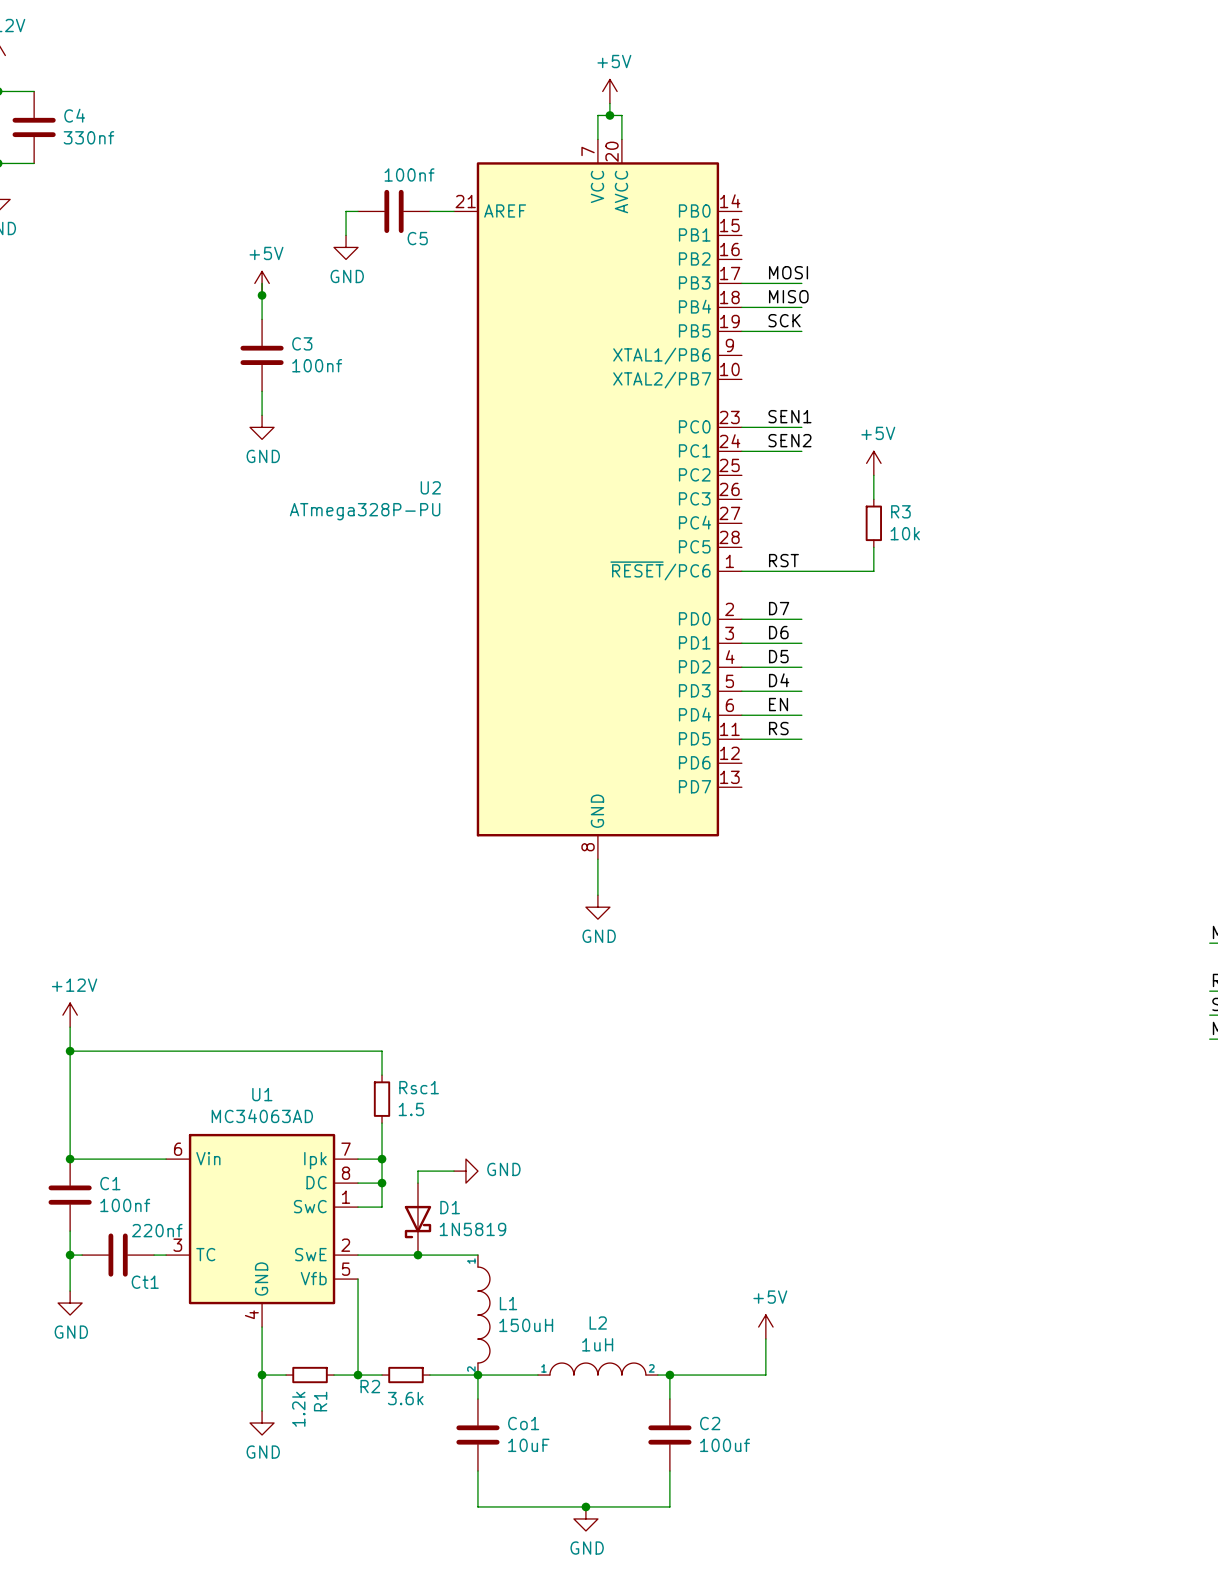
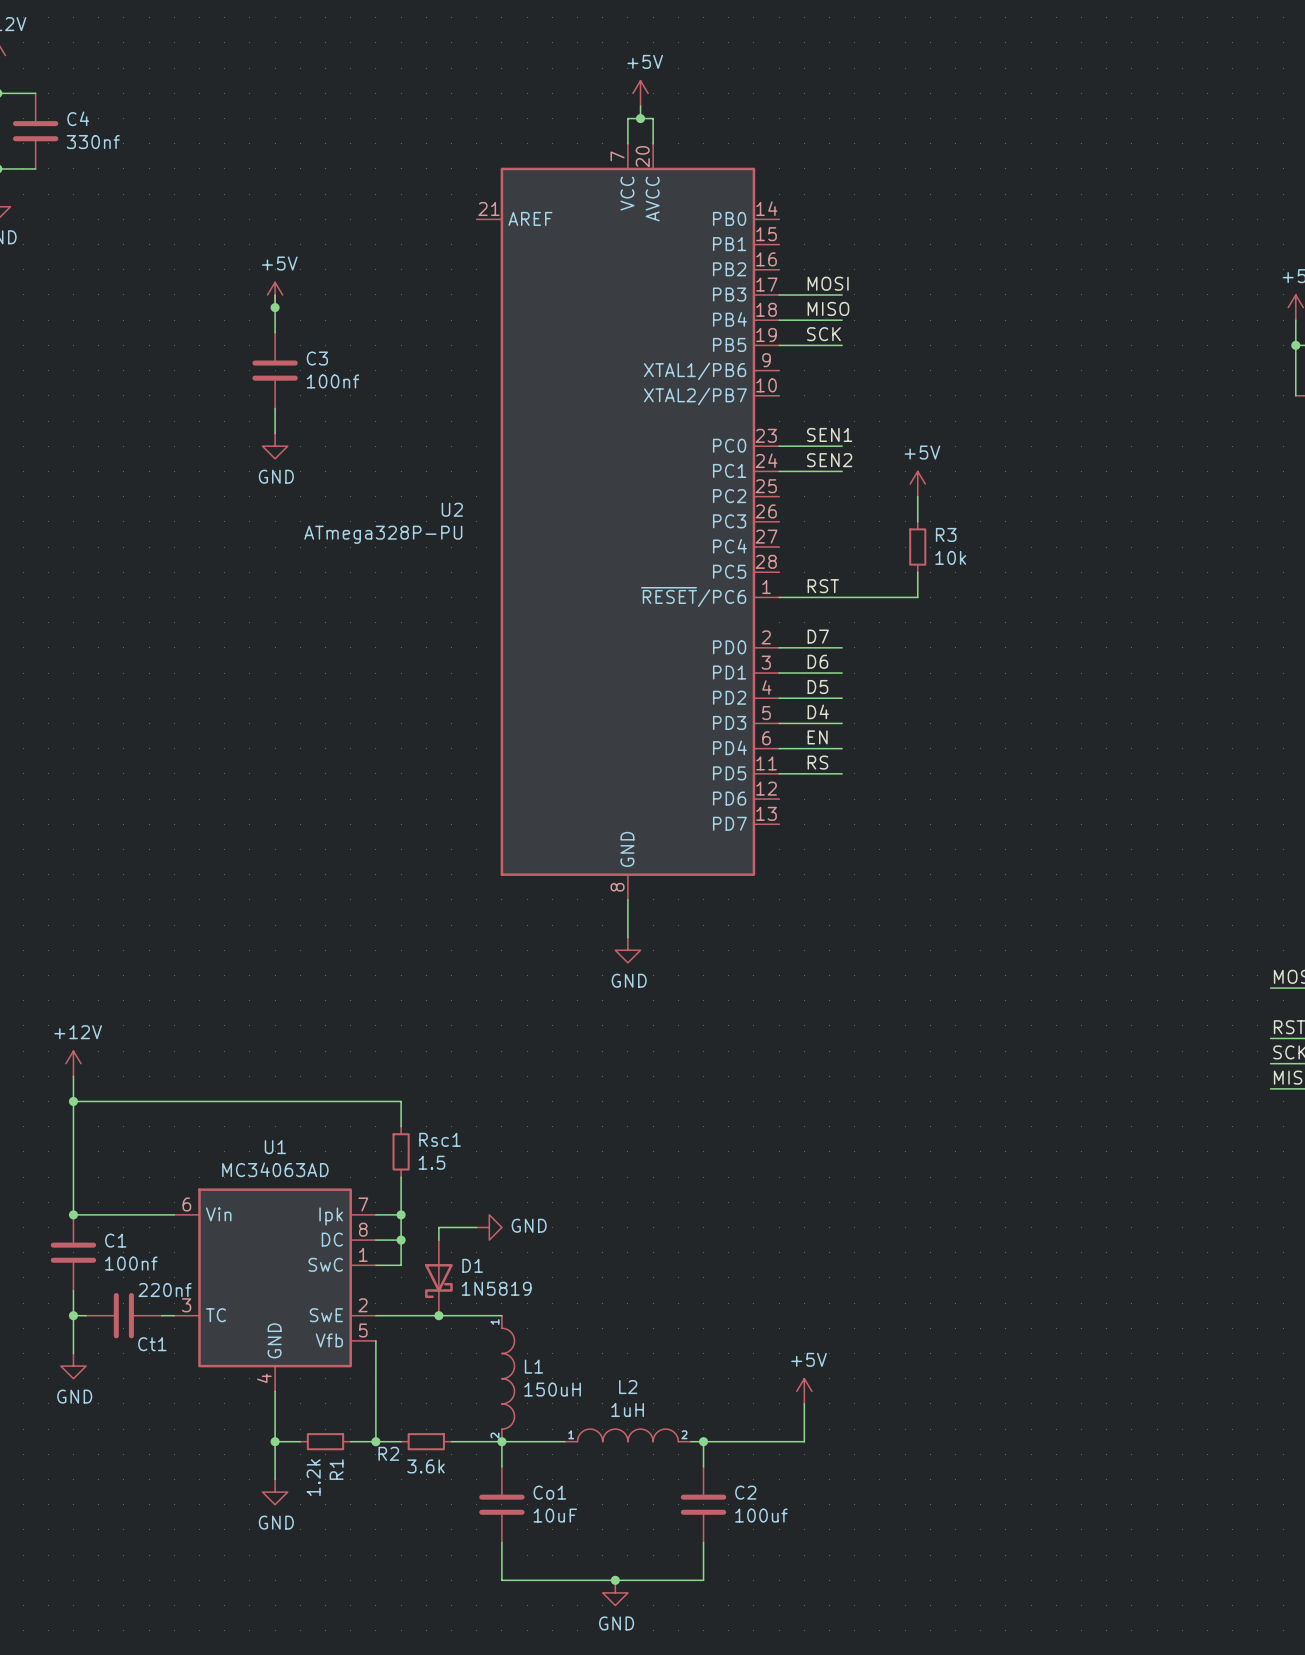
wire: (358, 211) (346, 211) (346, 235) -> none
C5: 100nf (394, 211) -> none
wire: (429, 211) (453, 211) -> none
power symbol: GND (346, 247) -> none

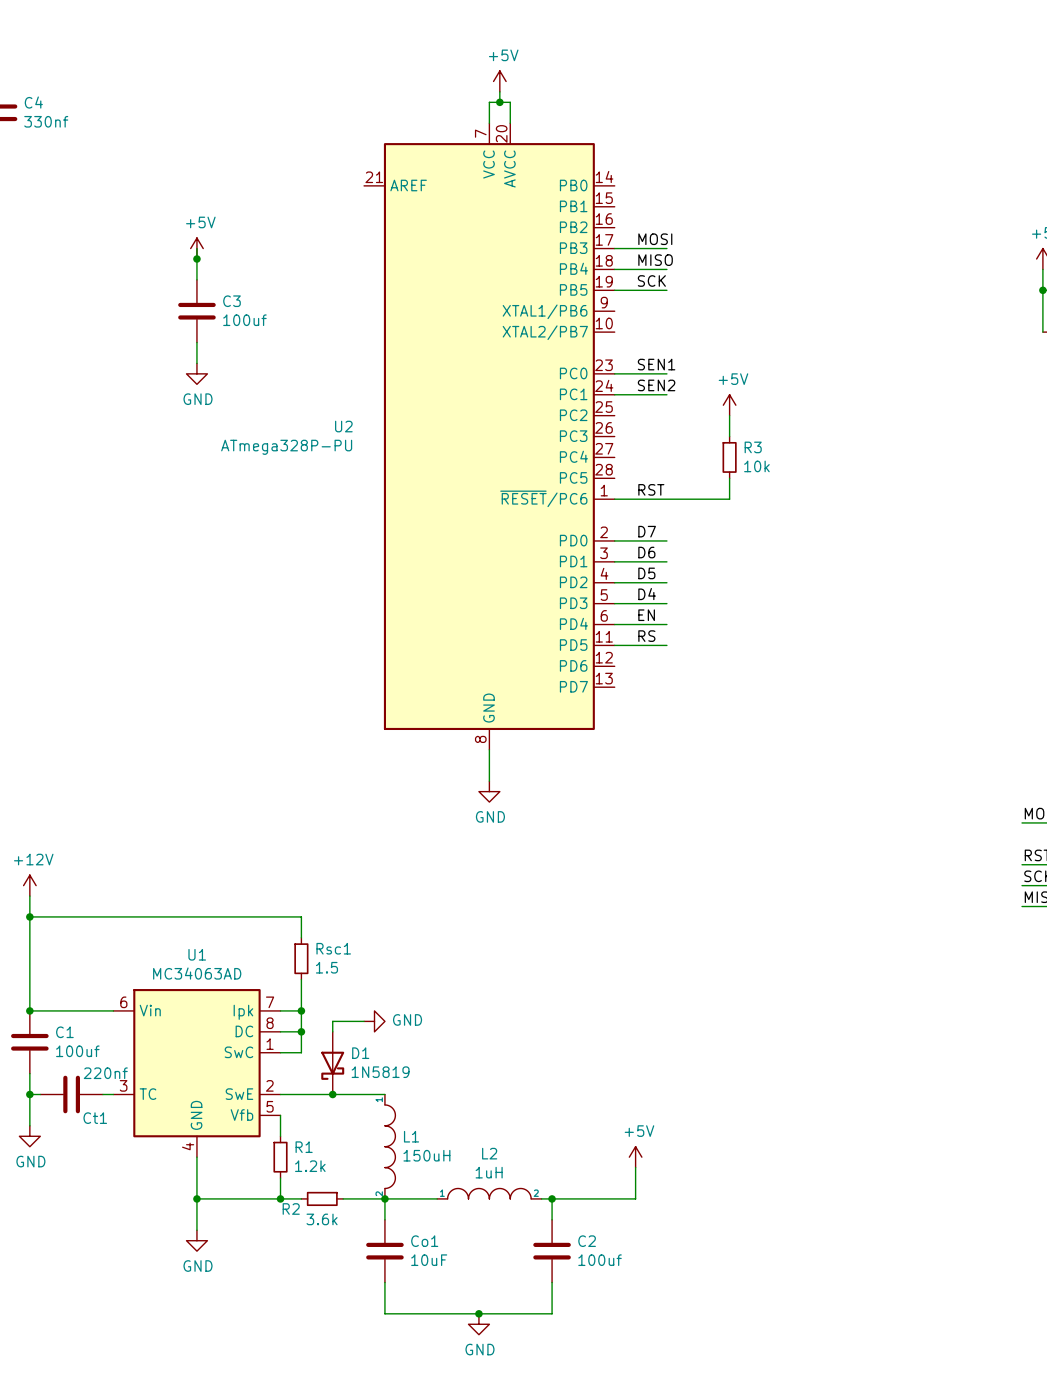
C3 value: 100nf (332, 381) -> 100uf (244, 320)
C1 value: 100nf (131, 1263) -> 100uf (77, 1051)
wire: (375, 1366) (375, 1416) -> none
wire: none -> (217, 1198) (259, 1198)
R1 rotation: 0° (325, 1441) -> 90° clockwise (280, 1157)
R1 position: (325, 1441) -> (280, 1157)
R1 name position: R1 (336, 1469) -> R1 (304, 1147)
R1 value position: 1.2k (313, 1477) -> 1.2k (310, 1166)

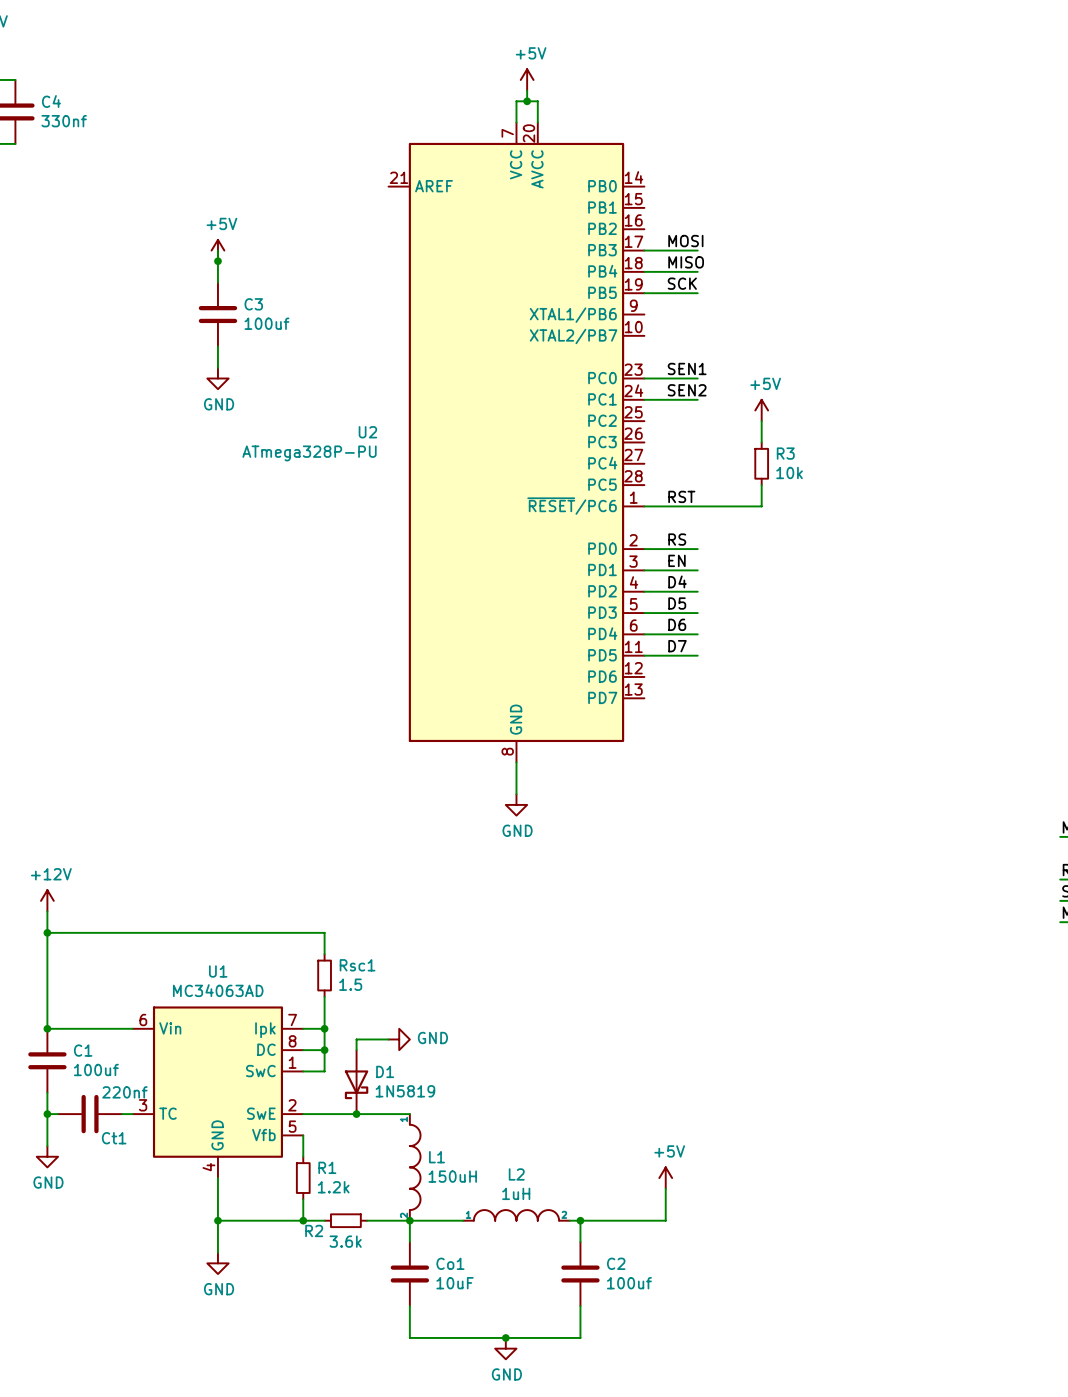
label: D7 (647, 531) -> RS (677, 539)
label: D6 (646, 552) -> EN (676, 560)
label: D5 (646, 573) -> D4 (677, 581)
label: D4 (647, 594) -> D5 (677, 603)
label: EN (646, 615) -> D6 (677, 624)
label: RS (646, 636) -> D7 (677, 646)

